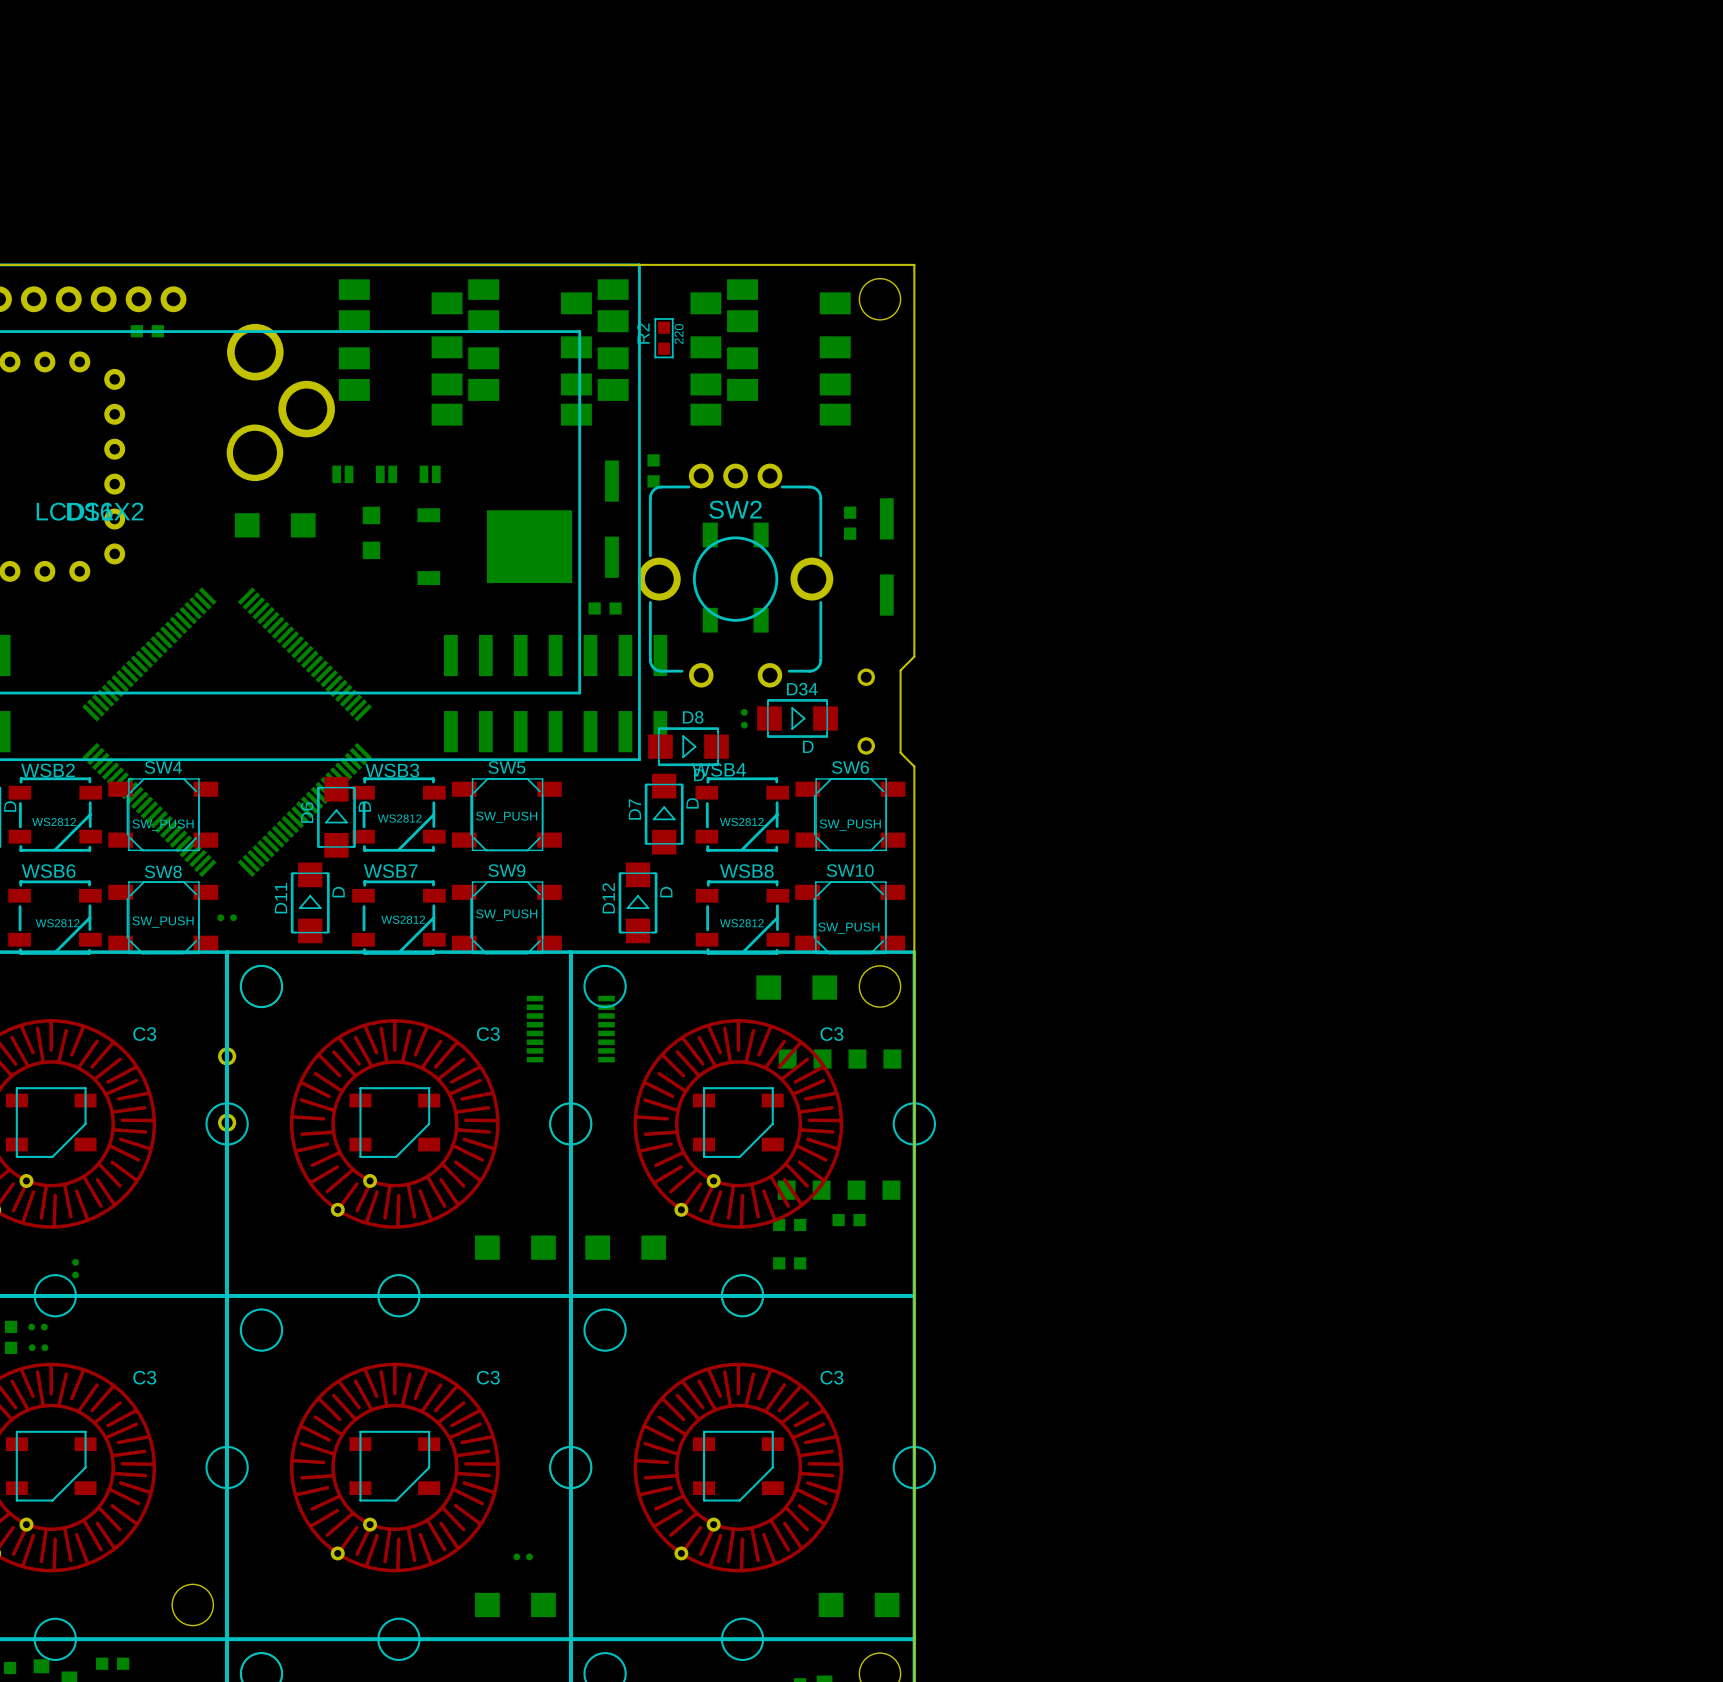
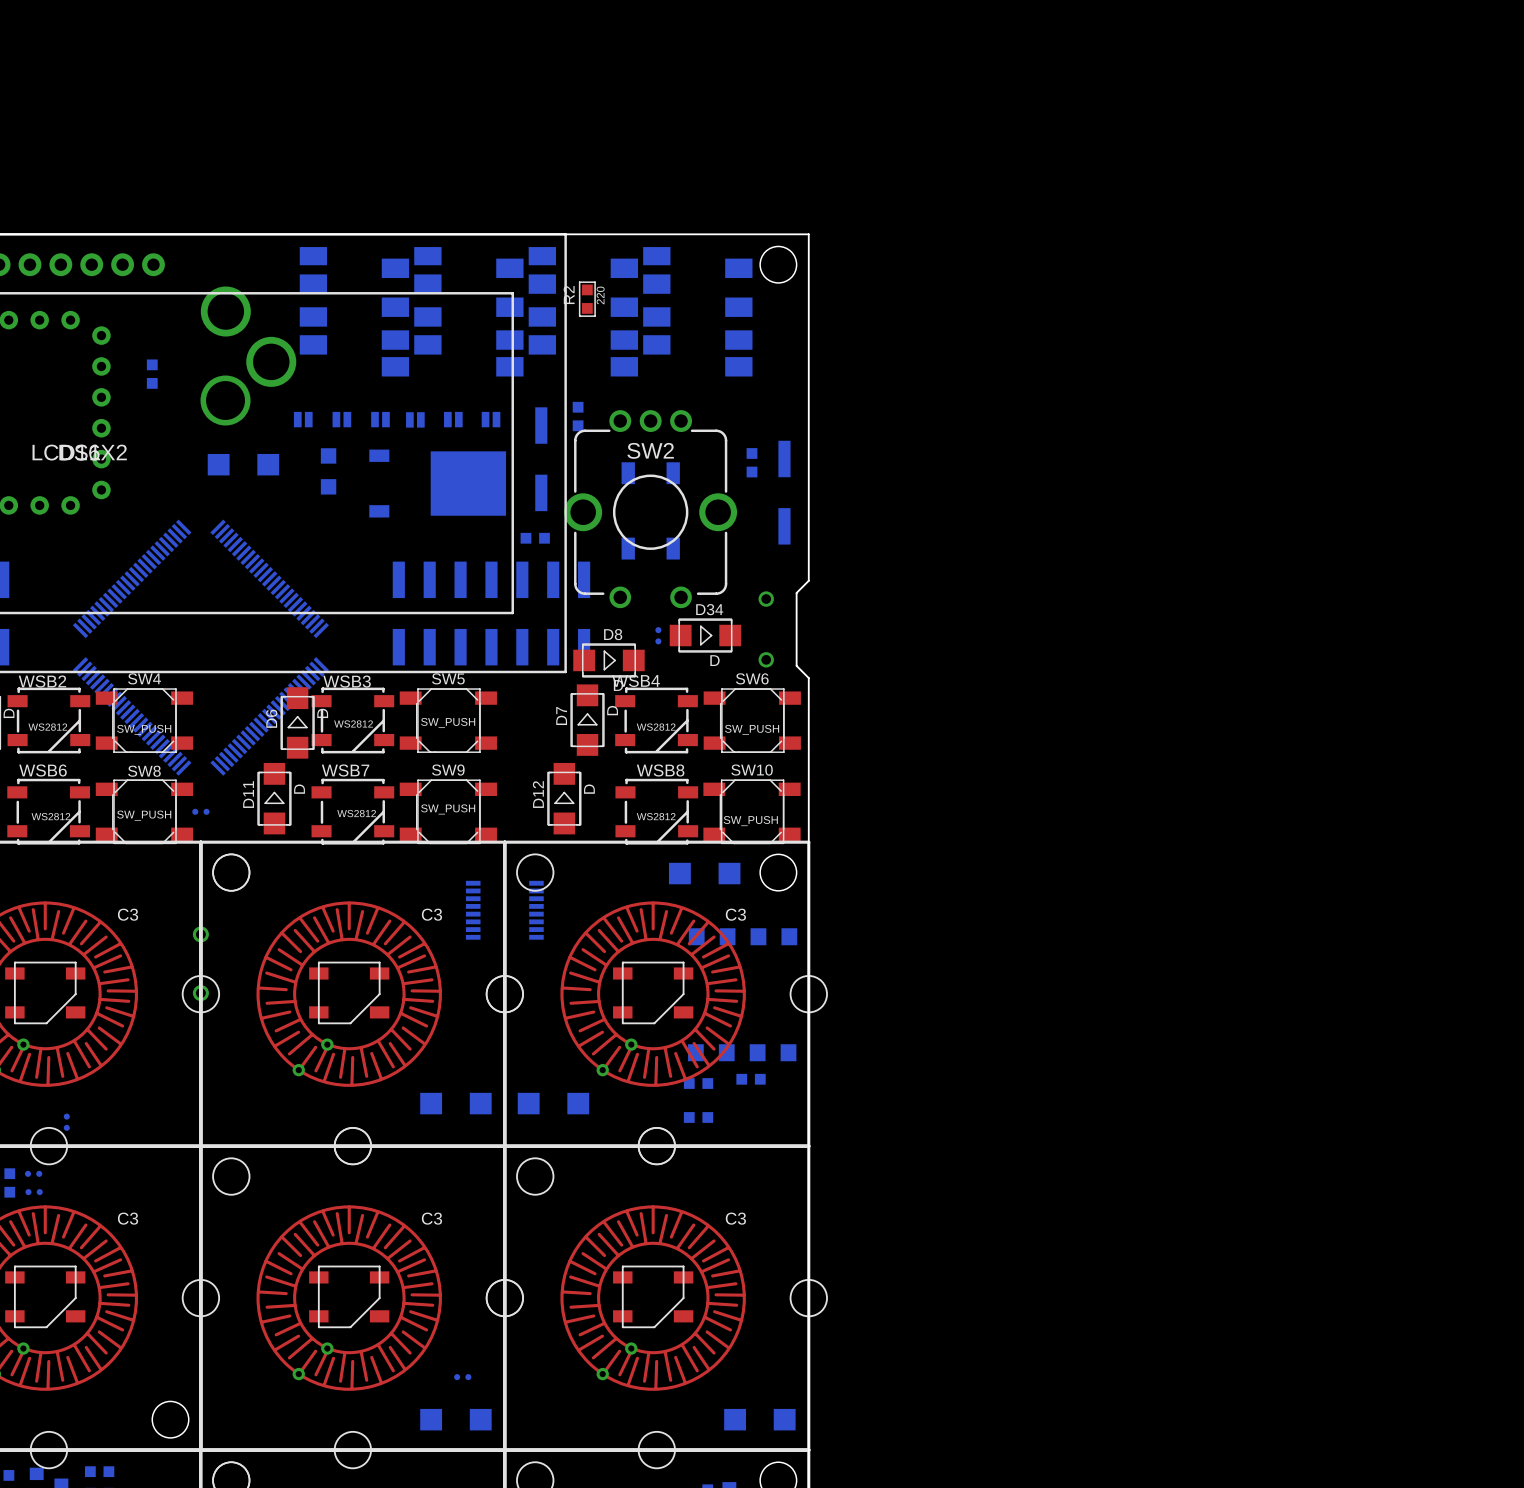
part rotation: 0° (147, 331) -> 90° clockwise (152, 374)
part position: (147, 331) -> (152, 374)
part: none -> (415, 419)
part: none -> (453, 419)
part: none -> (491, 419)

